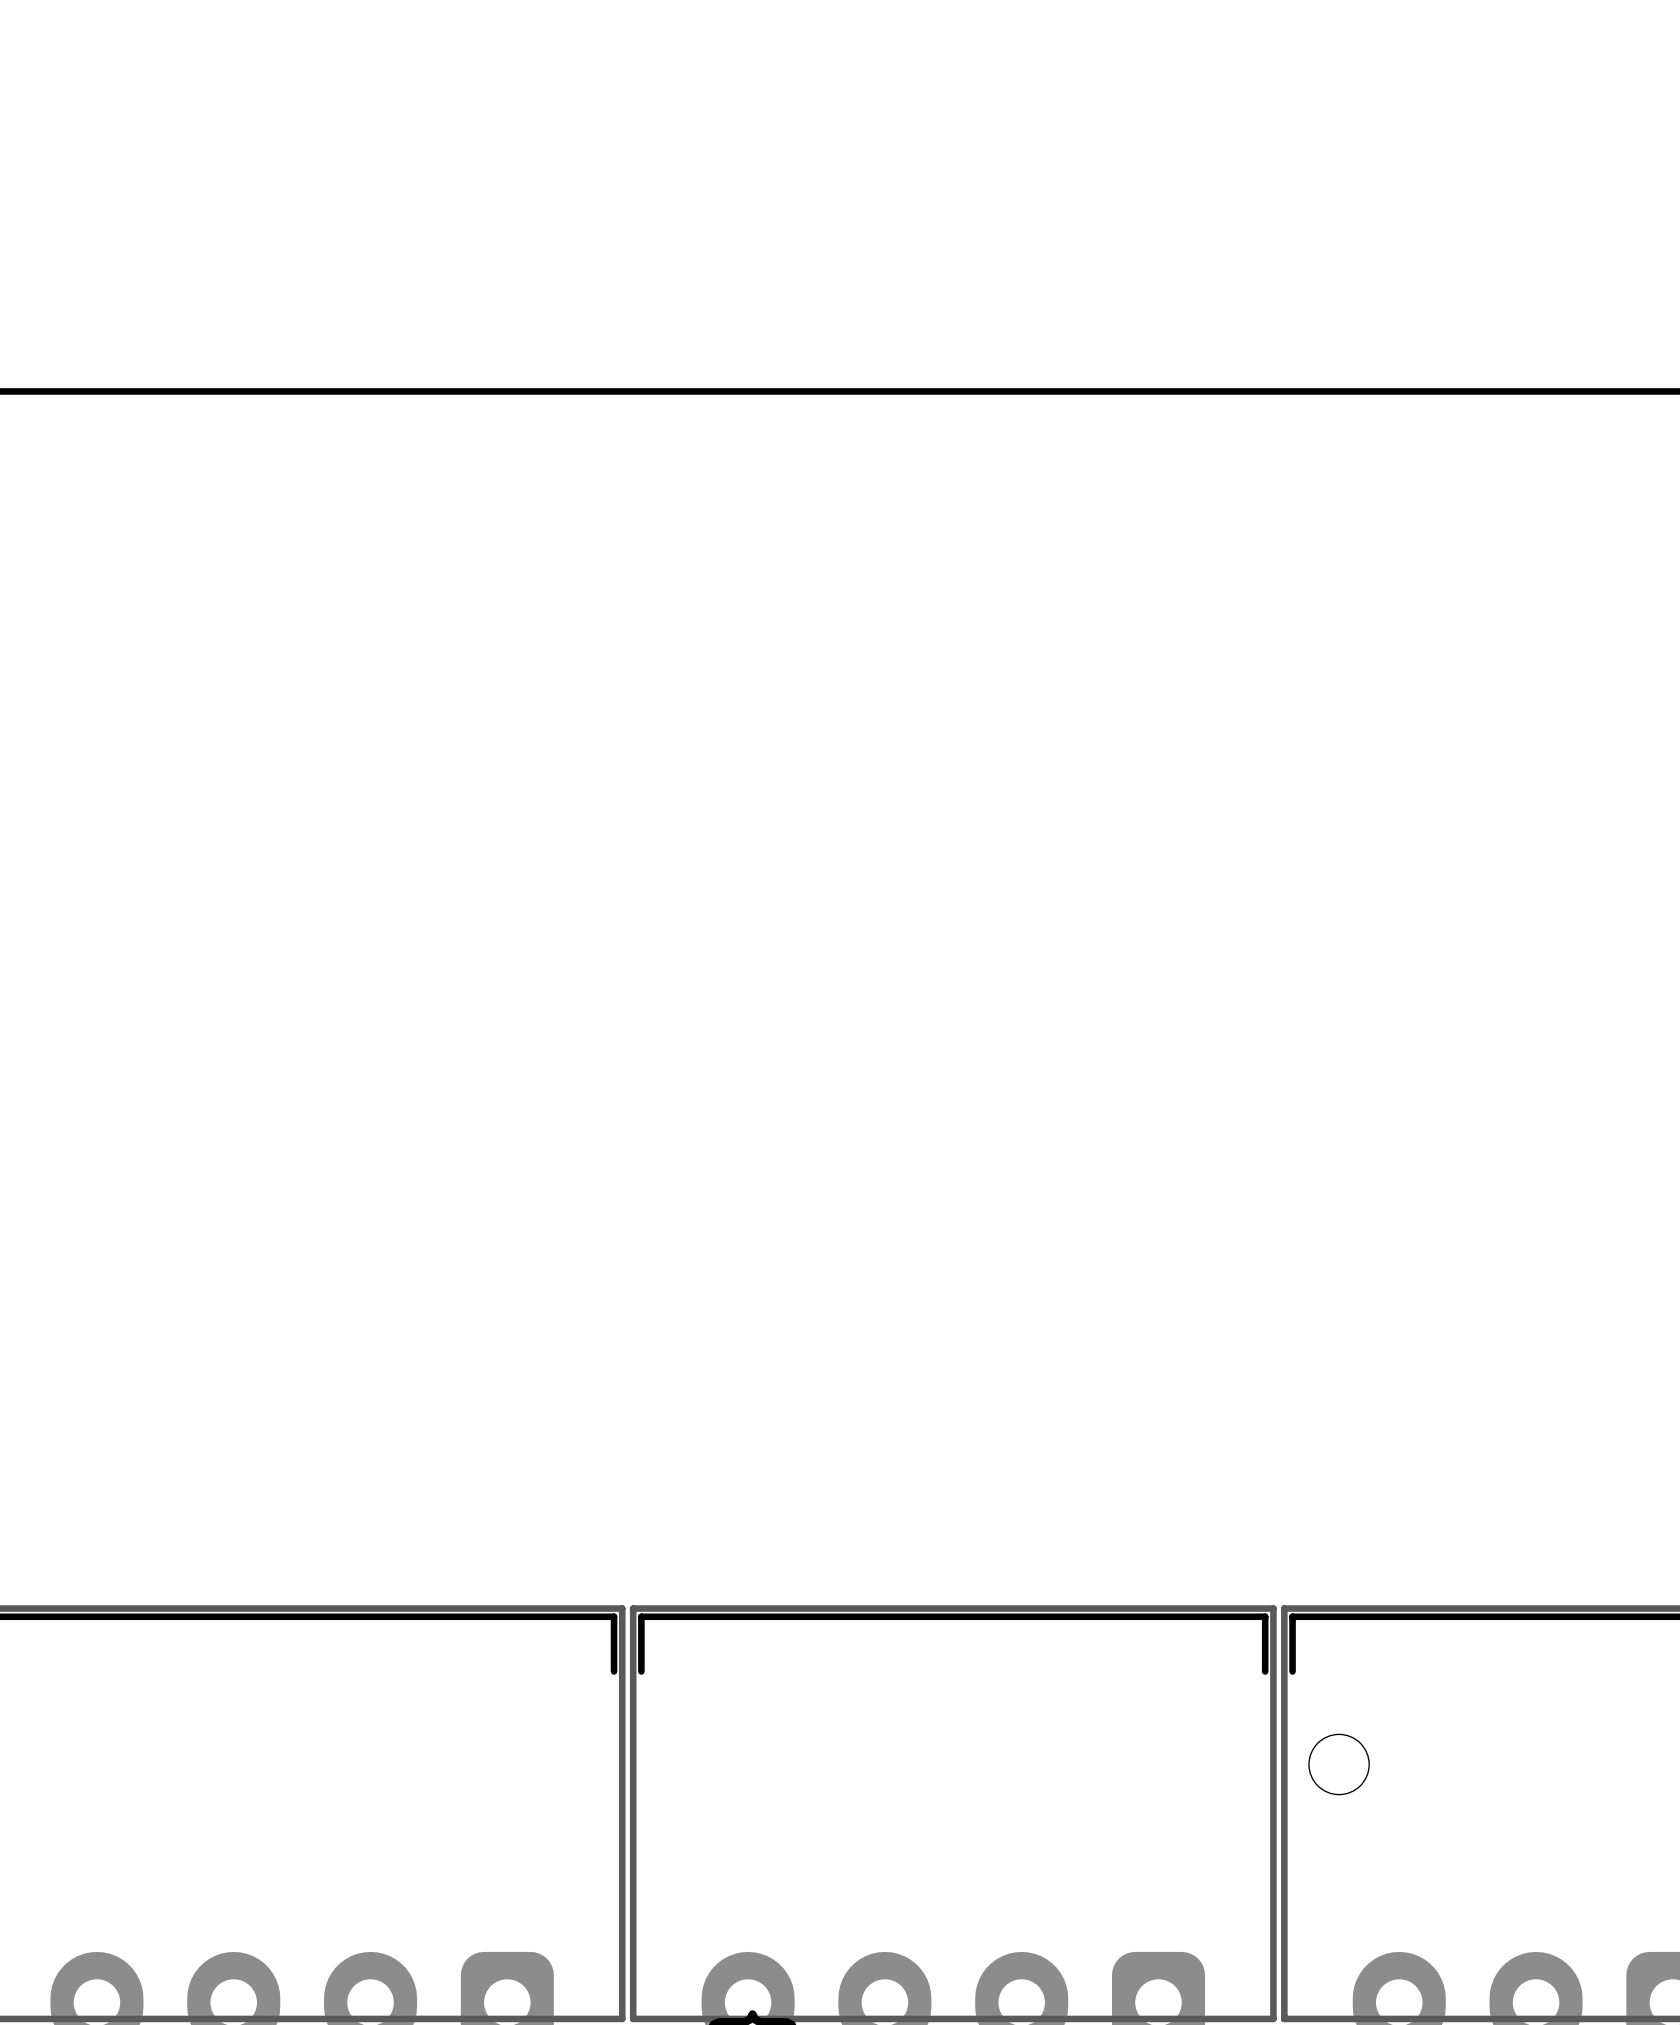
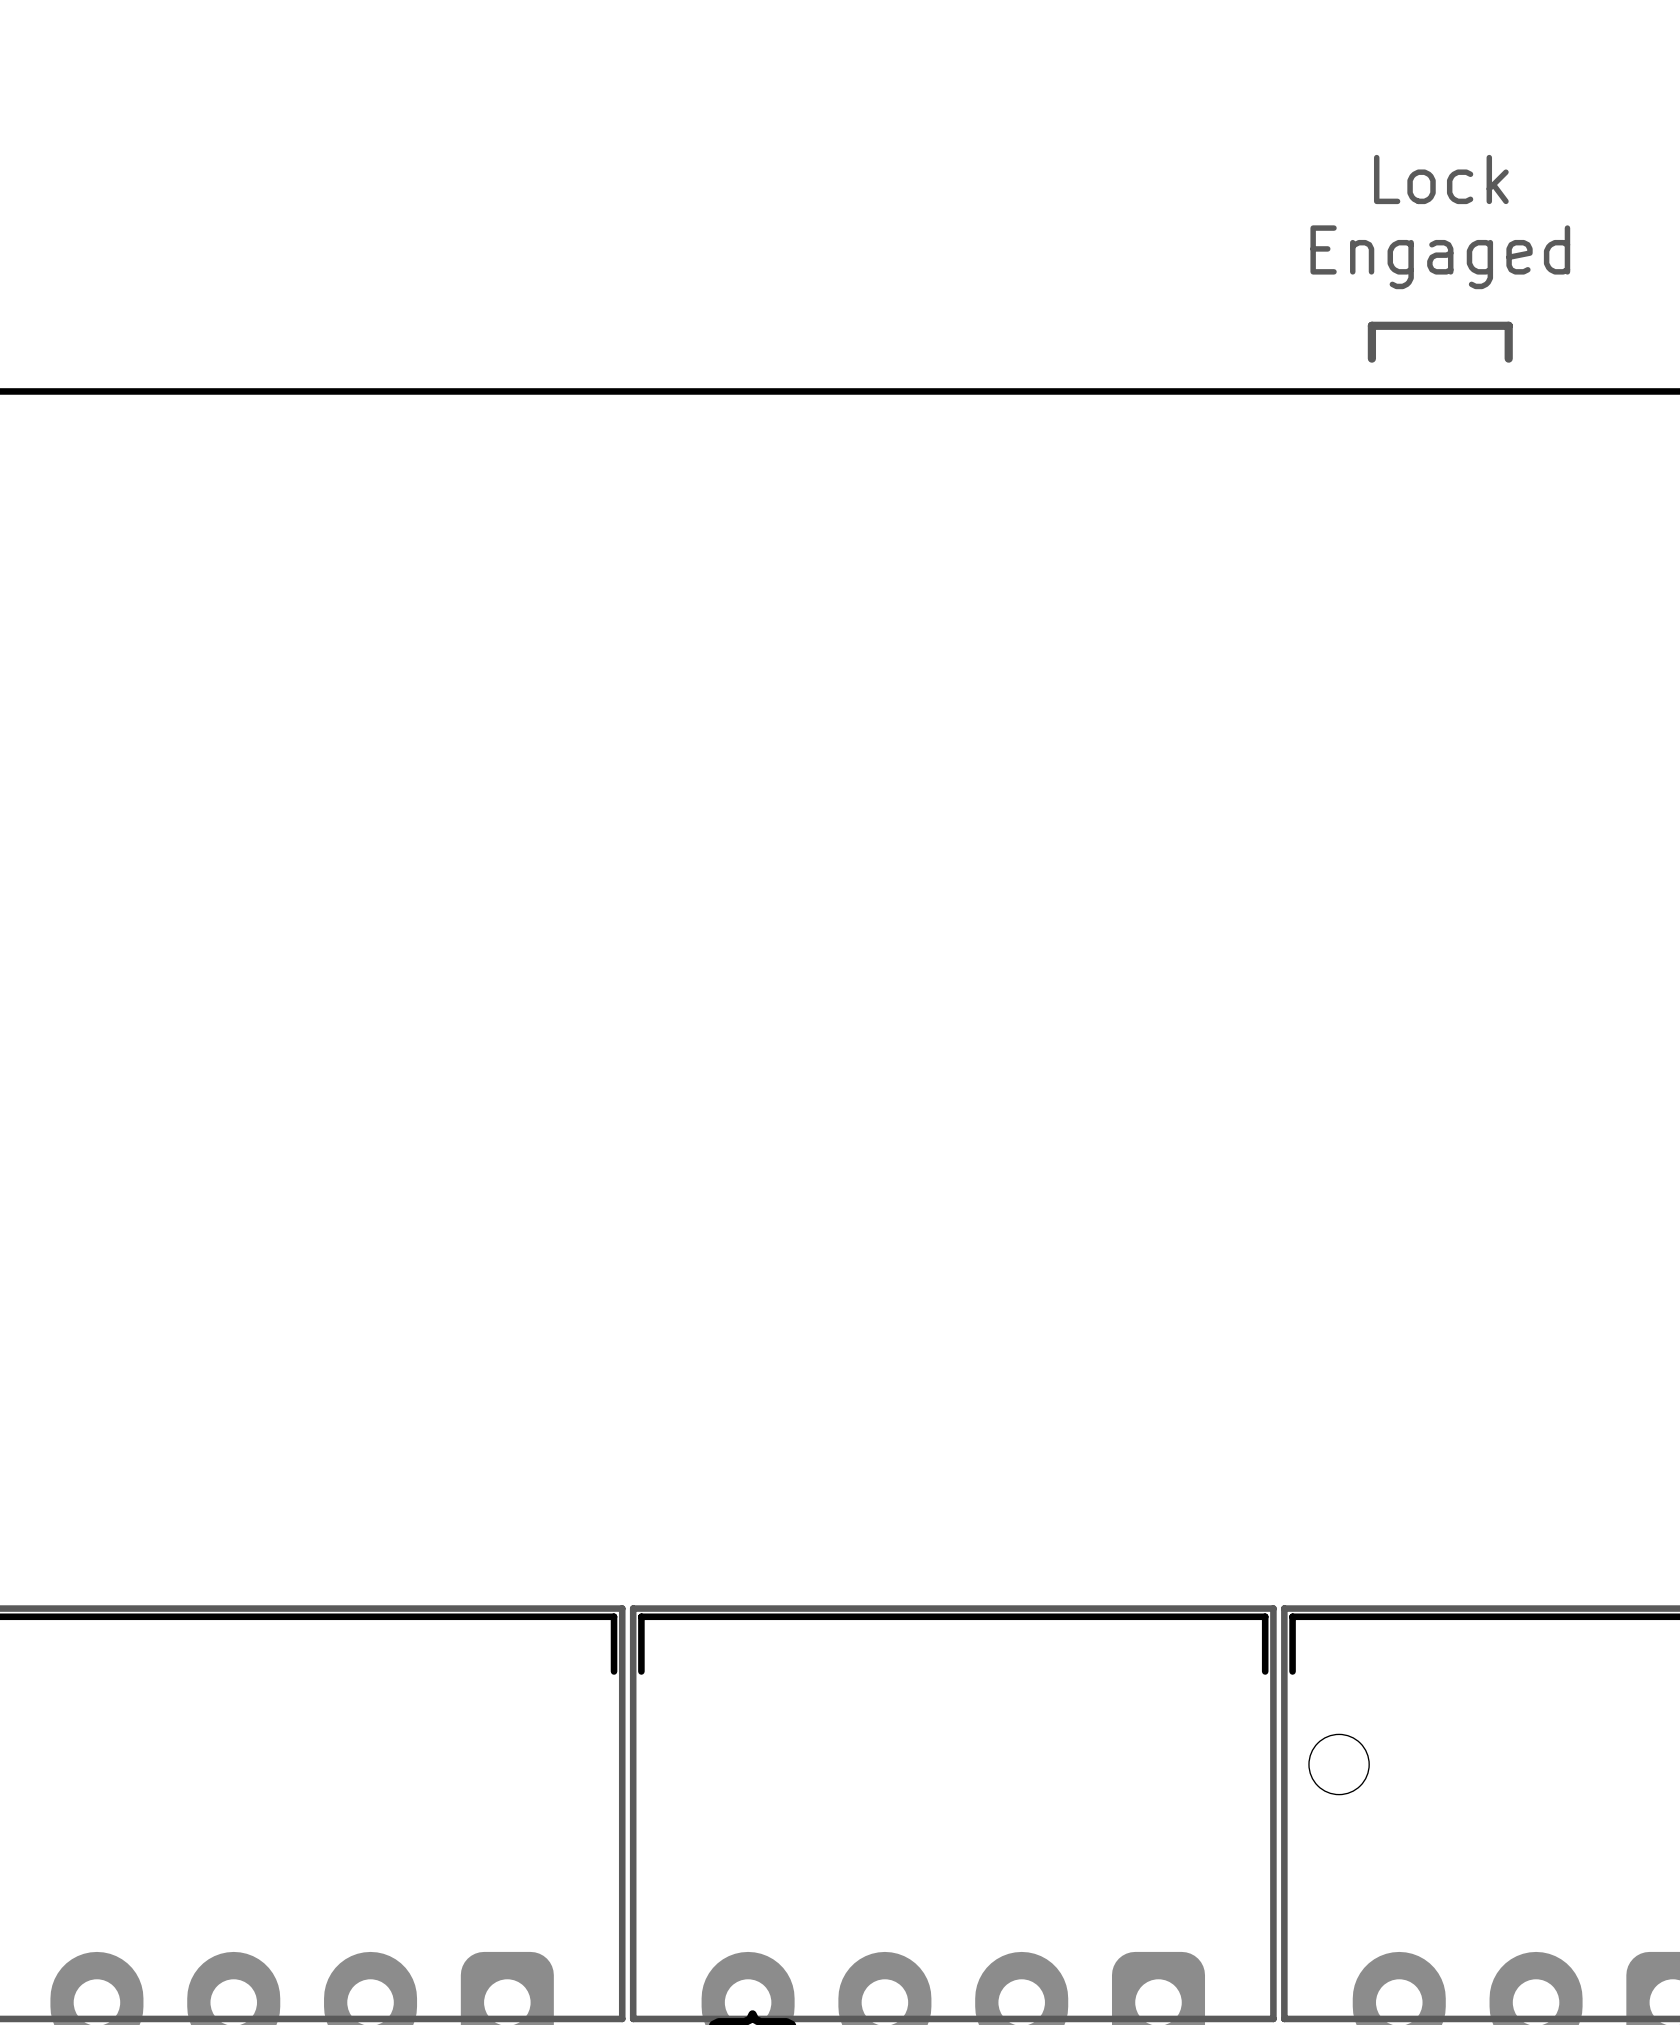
text: none -> Lock (1441, 179)
text: none -> Engaged (1440, 257)
line: none -> (1371, 358) (1371, 325) (1508, 325) (1508, 358)

